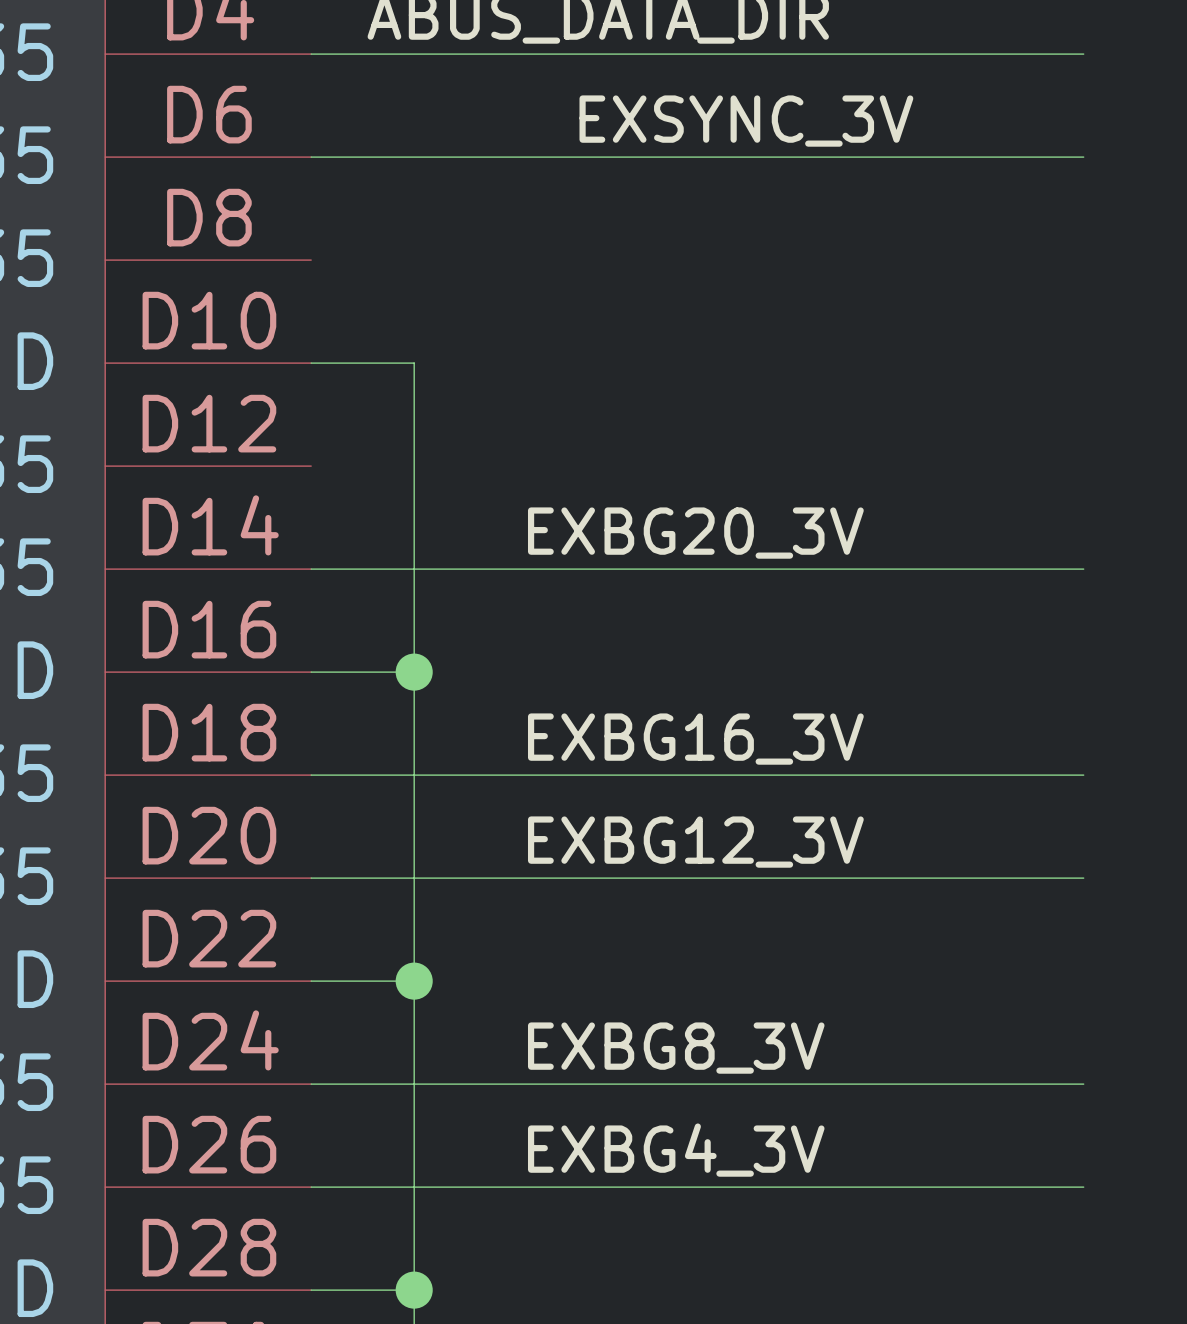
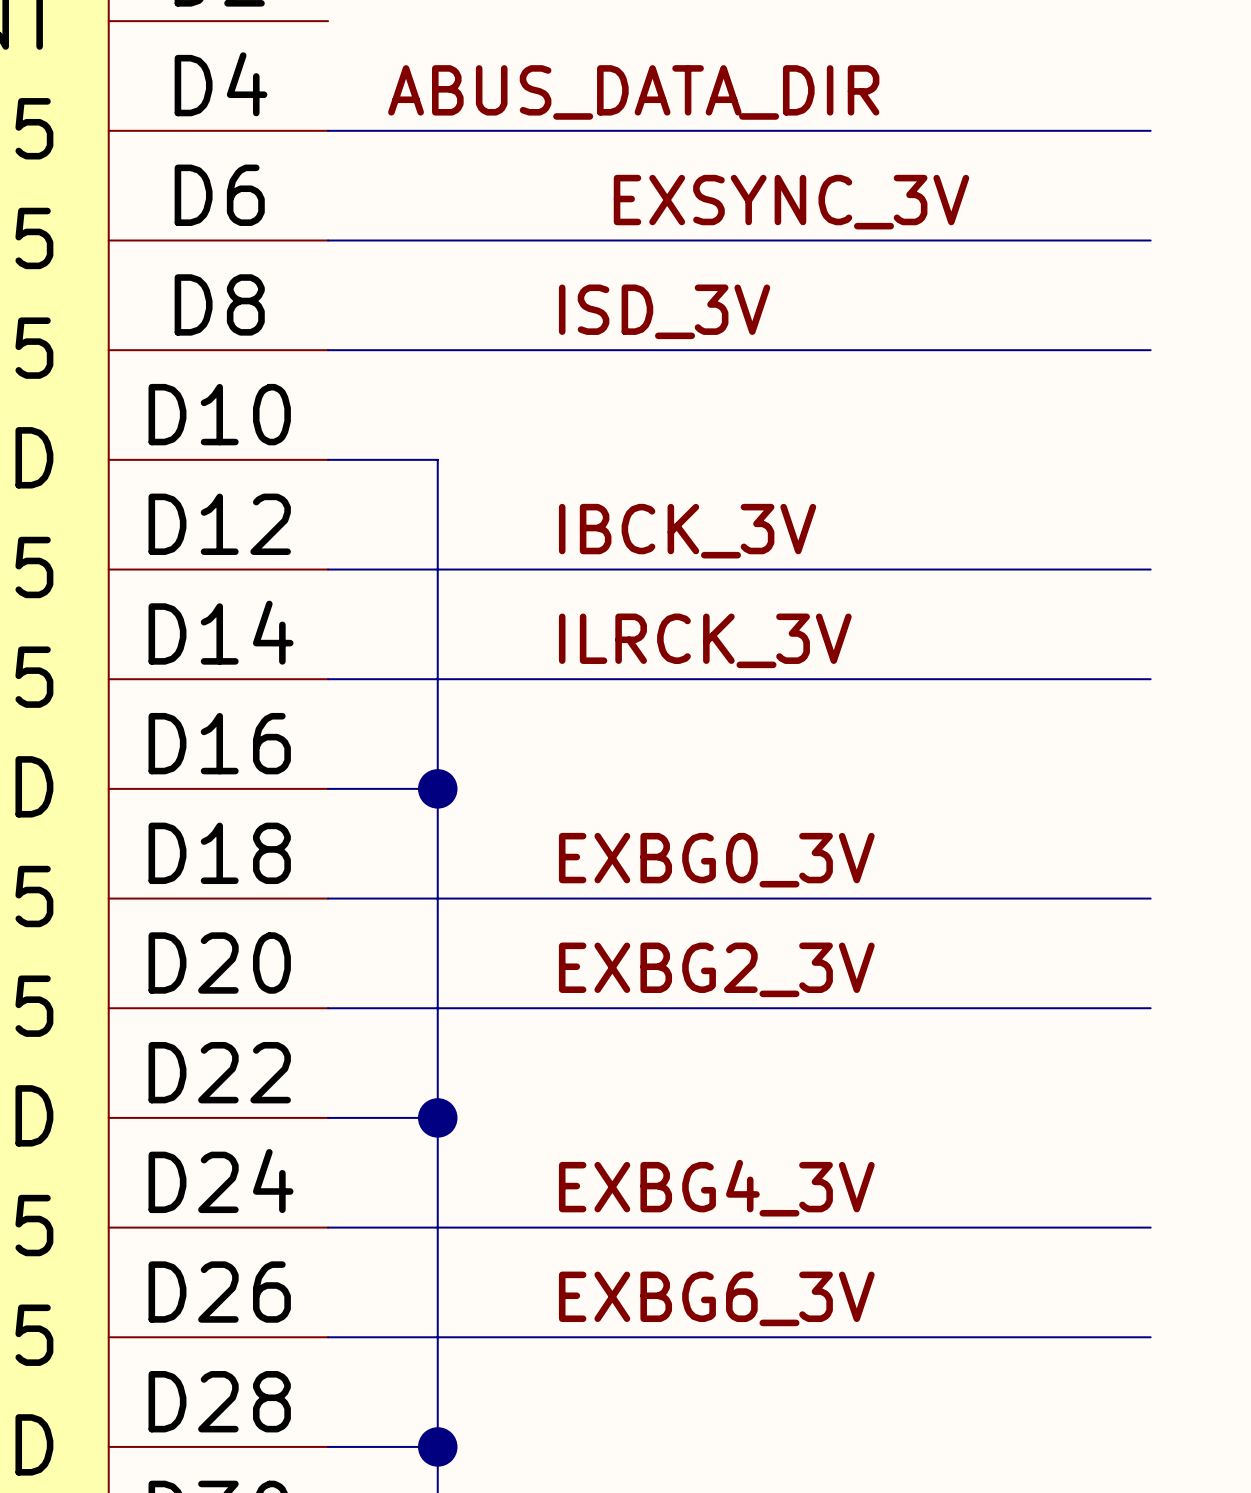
label: none -> ISD_3V (664, 311)
wire: none -> (328, 350) (1150, 350)
label: none -> IBCK_3V (687, 531)
wire: none -> (328, 569) (1150, 569)
label: EXBG20_3V (695, 533) -> ILRCK_3V (705, 640)
label: EXBG16_3V (695, 739) -> EXBG0_3V (716, 860)
label: EXBG12_3V (695, 842) -> EXBG2_3V (716, 969)
label: EXBG8_3V (676, 1048) -> EXBG4_3V (716, 1188)
label: EXBG4_3V (676, 1150) -> EXBG6_3V (716, 1298)

